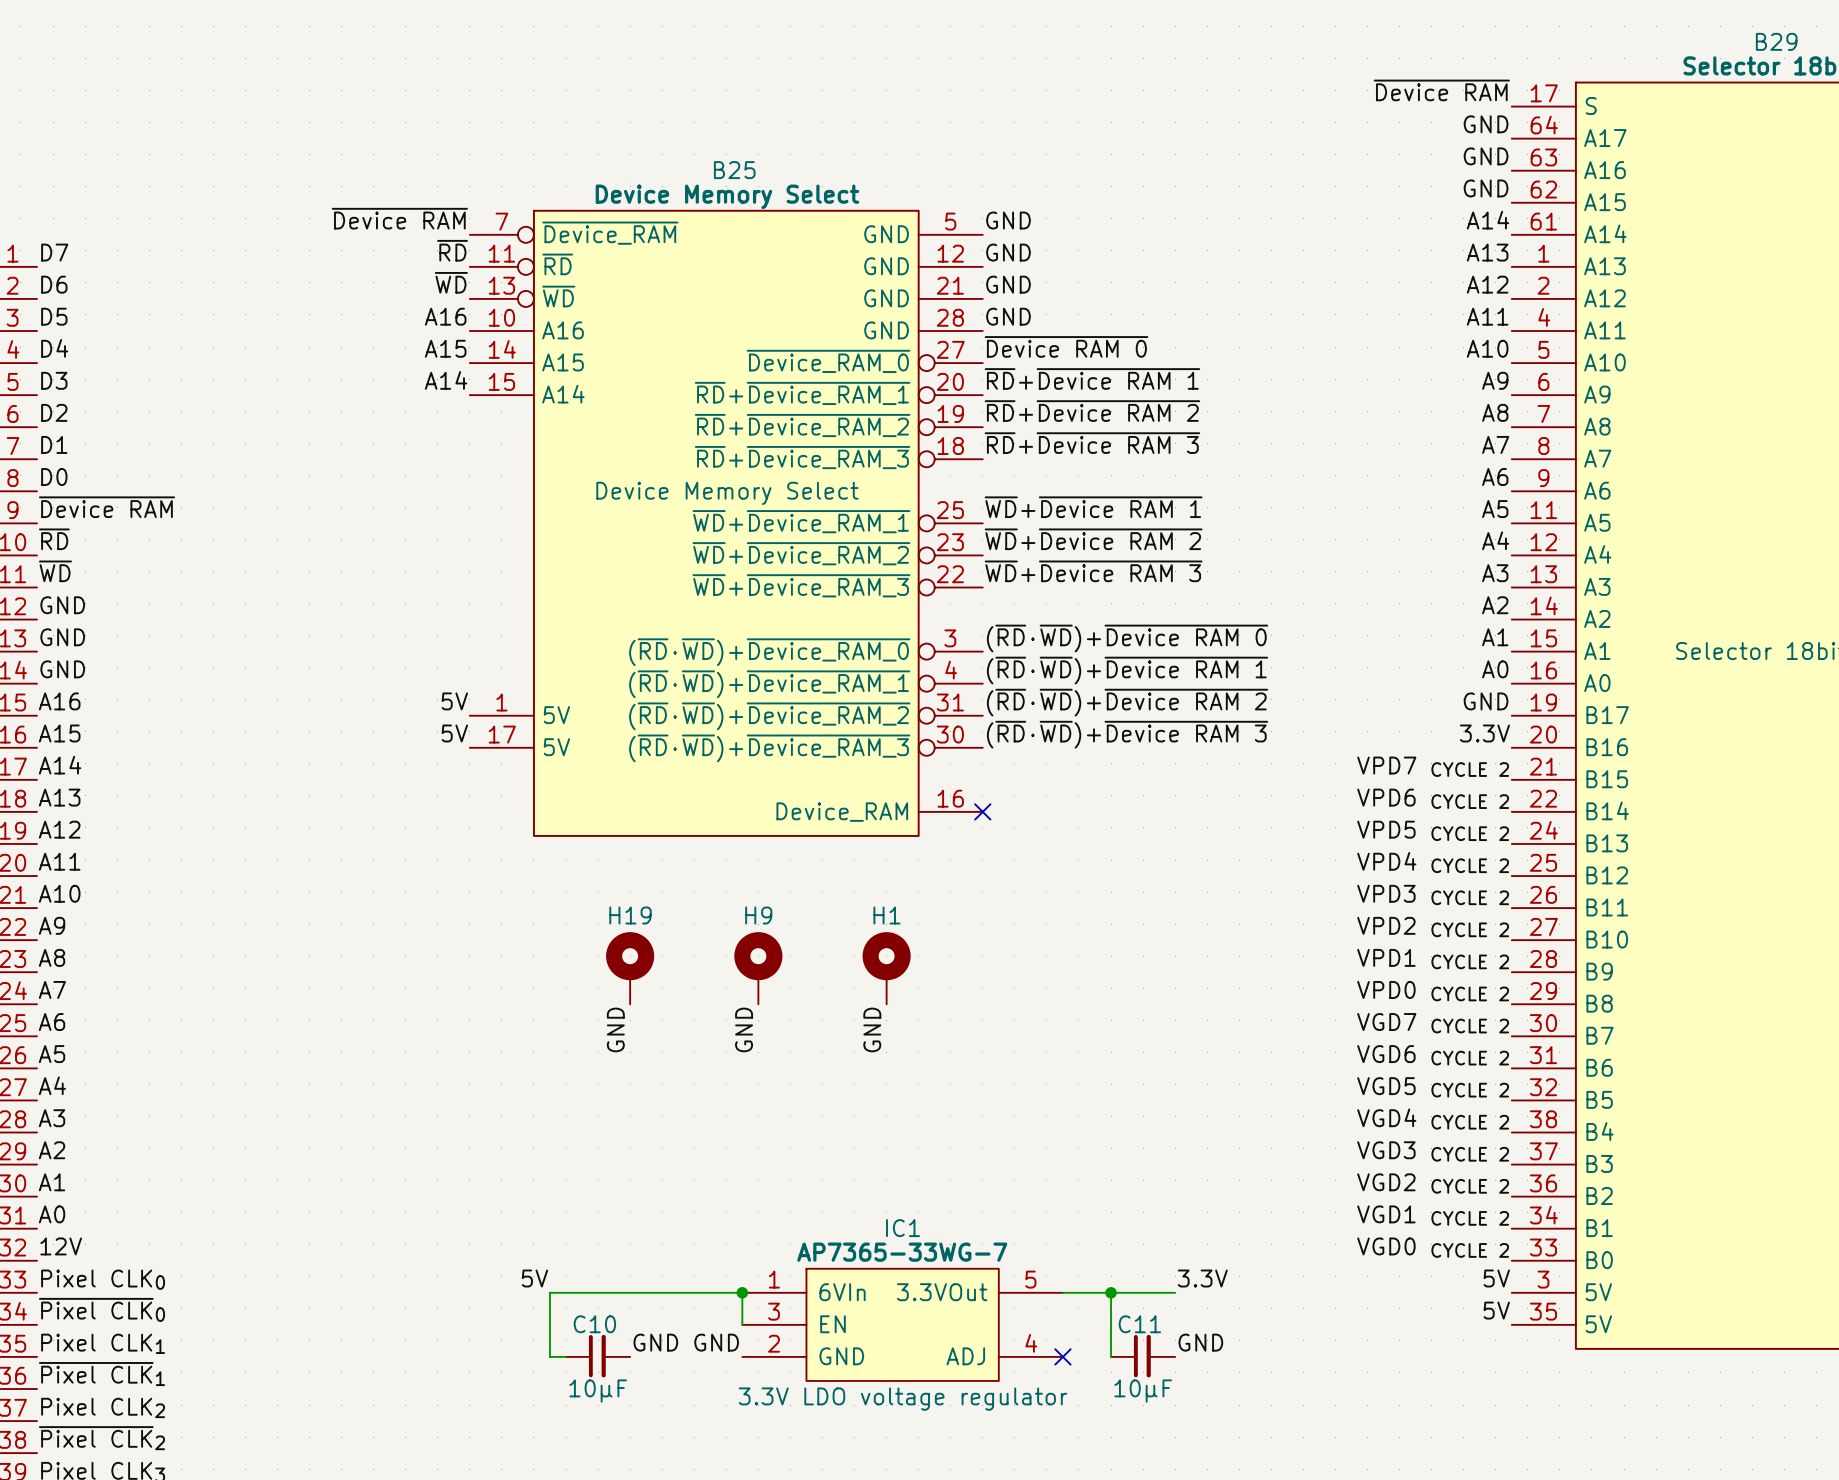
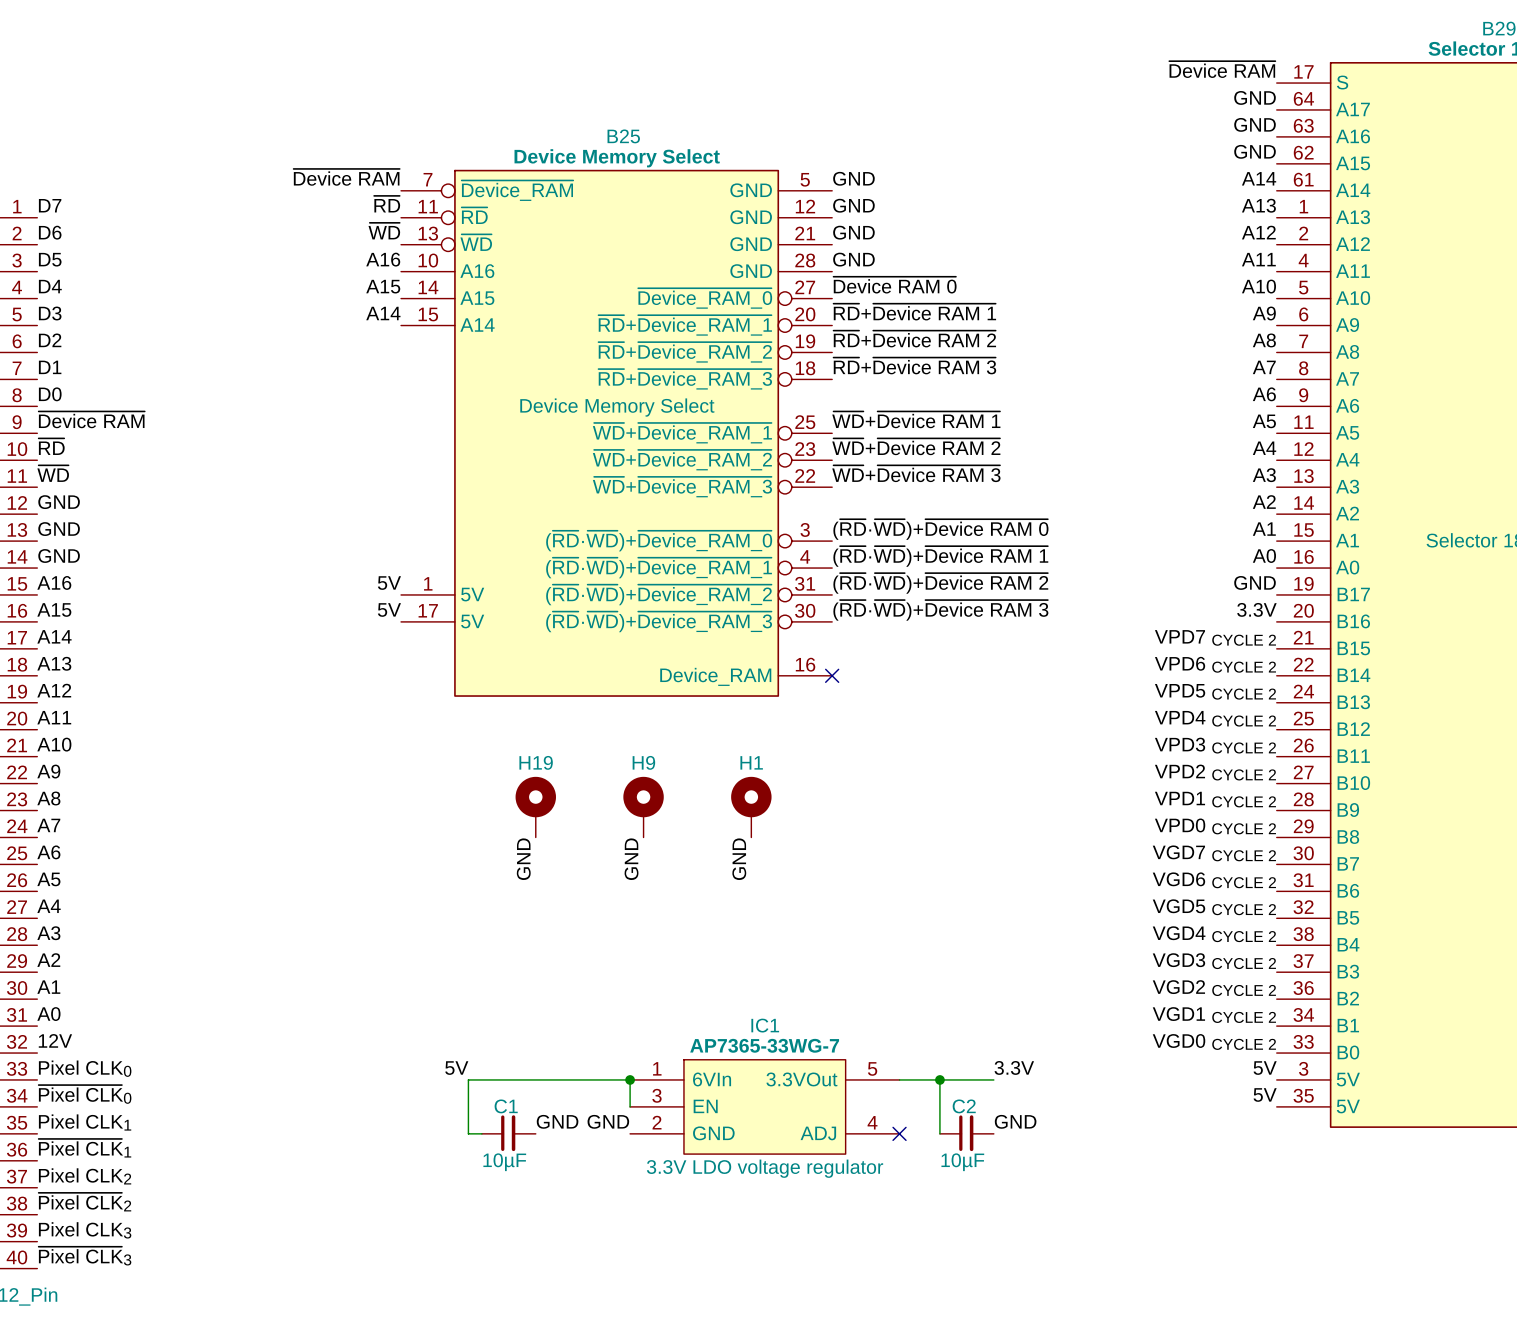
C10 name: C10 (594, 1324) -> C1 (506, 1106)
C11 name: C11 (1139, 1324) -> C2 (964, 1106)

